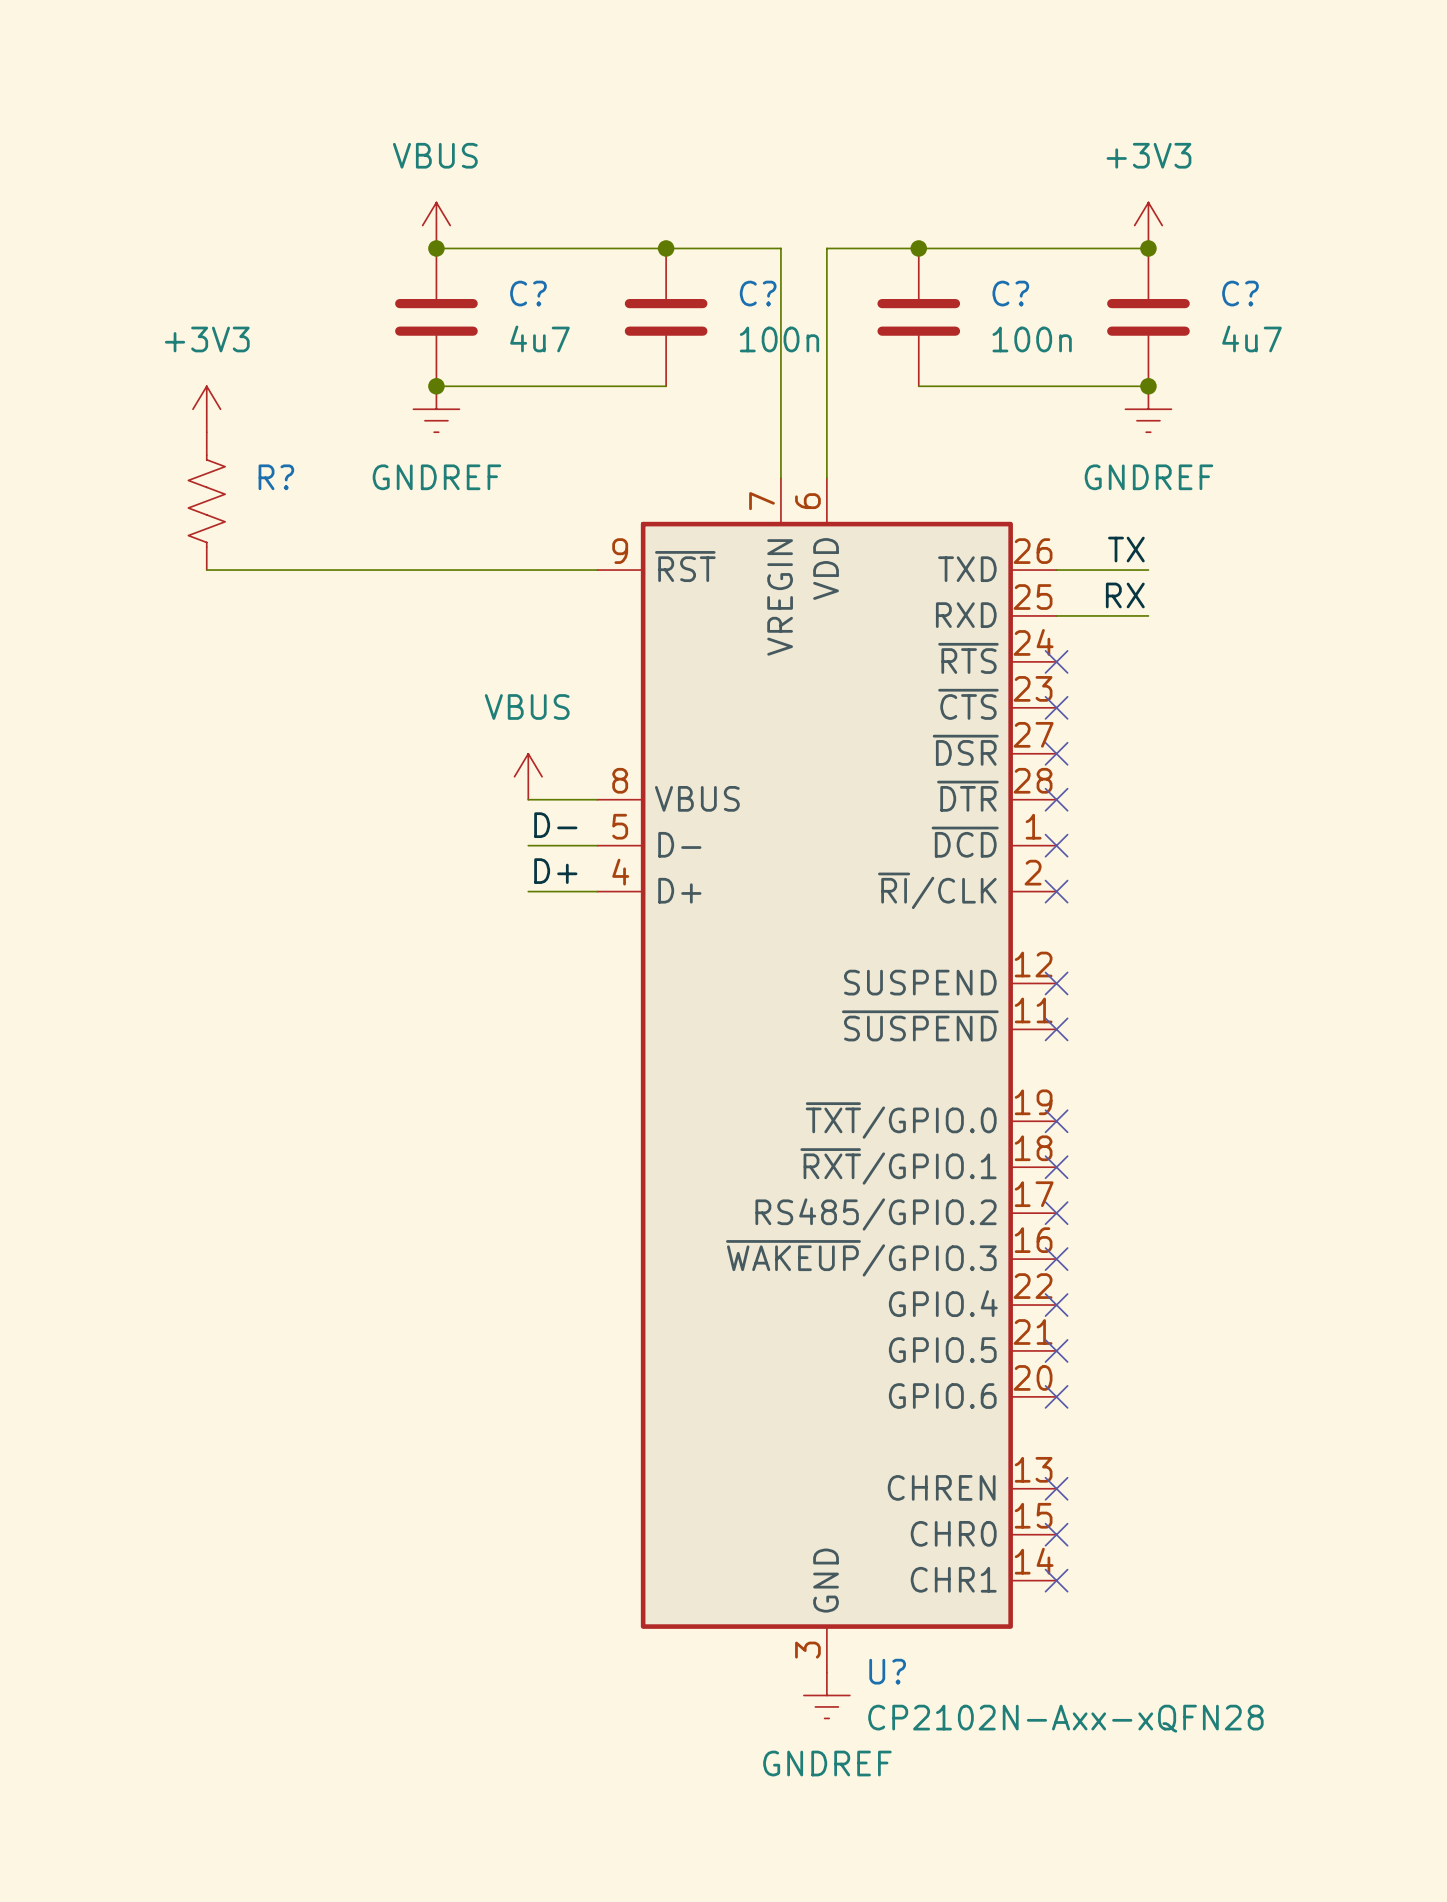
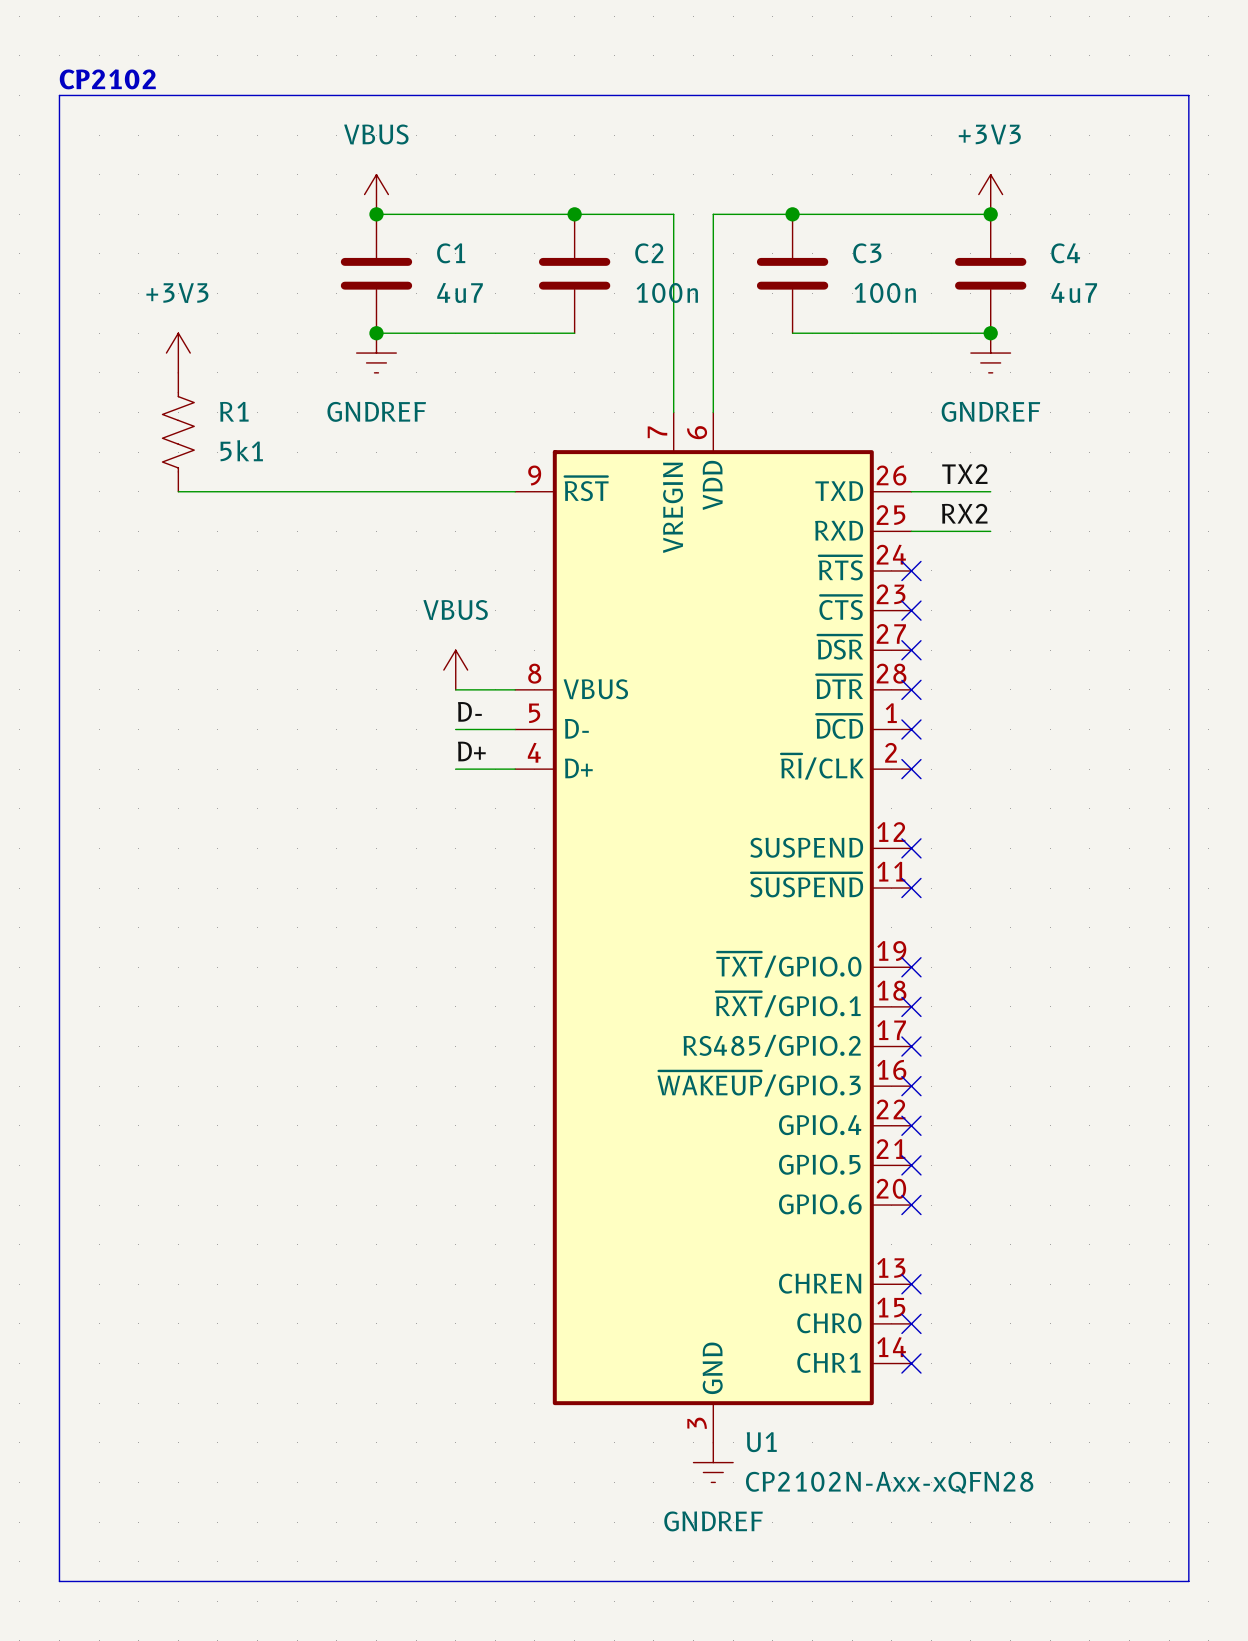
text: none -> CP2102 (107, 79)
line: none -> (59, 95) (1188, 95) (1188, 1581) (59, 1581) (59, 95)
C? name: C? (528, 293) -> C1 (451, 253)
C? name: C? (758, 293) -> C2 (649, 253)
C? name: C? (1010, 293) -> C3 (867, 253)
C? name: C? (1240, 293) -> C4 (1065, 253)
R? name: R? (276, 477) -> R1 (234, 411)
R? value: none -> 5k1 (241, 450)
label: TX (1126, 549) -> TX2 (964, 474)
label: RX (1125, 595) -> RX2 (964, 513)
U? name: U? (887, 1671) -> U1 (761, 1442)

